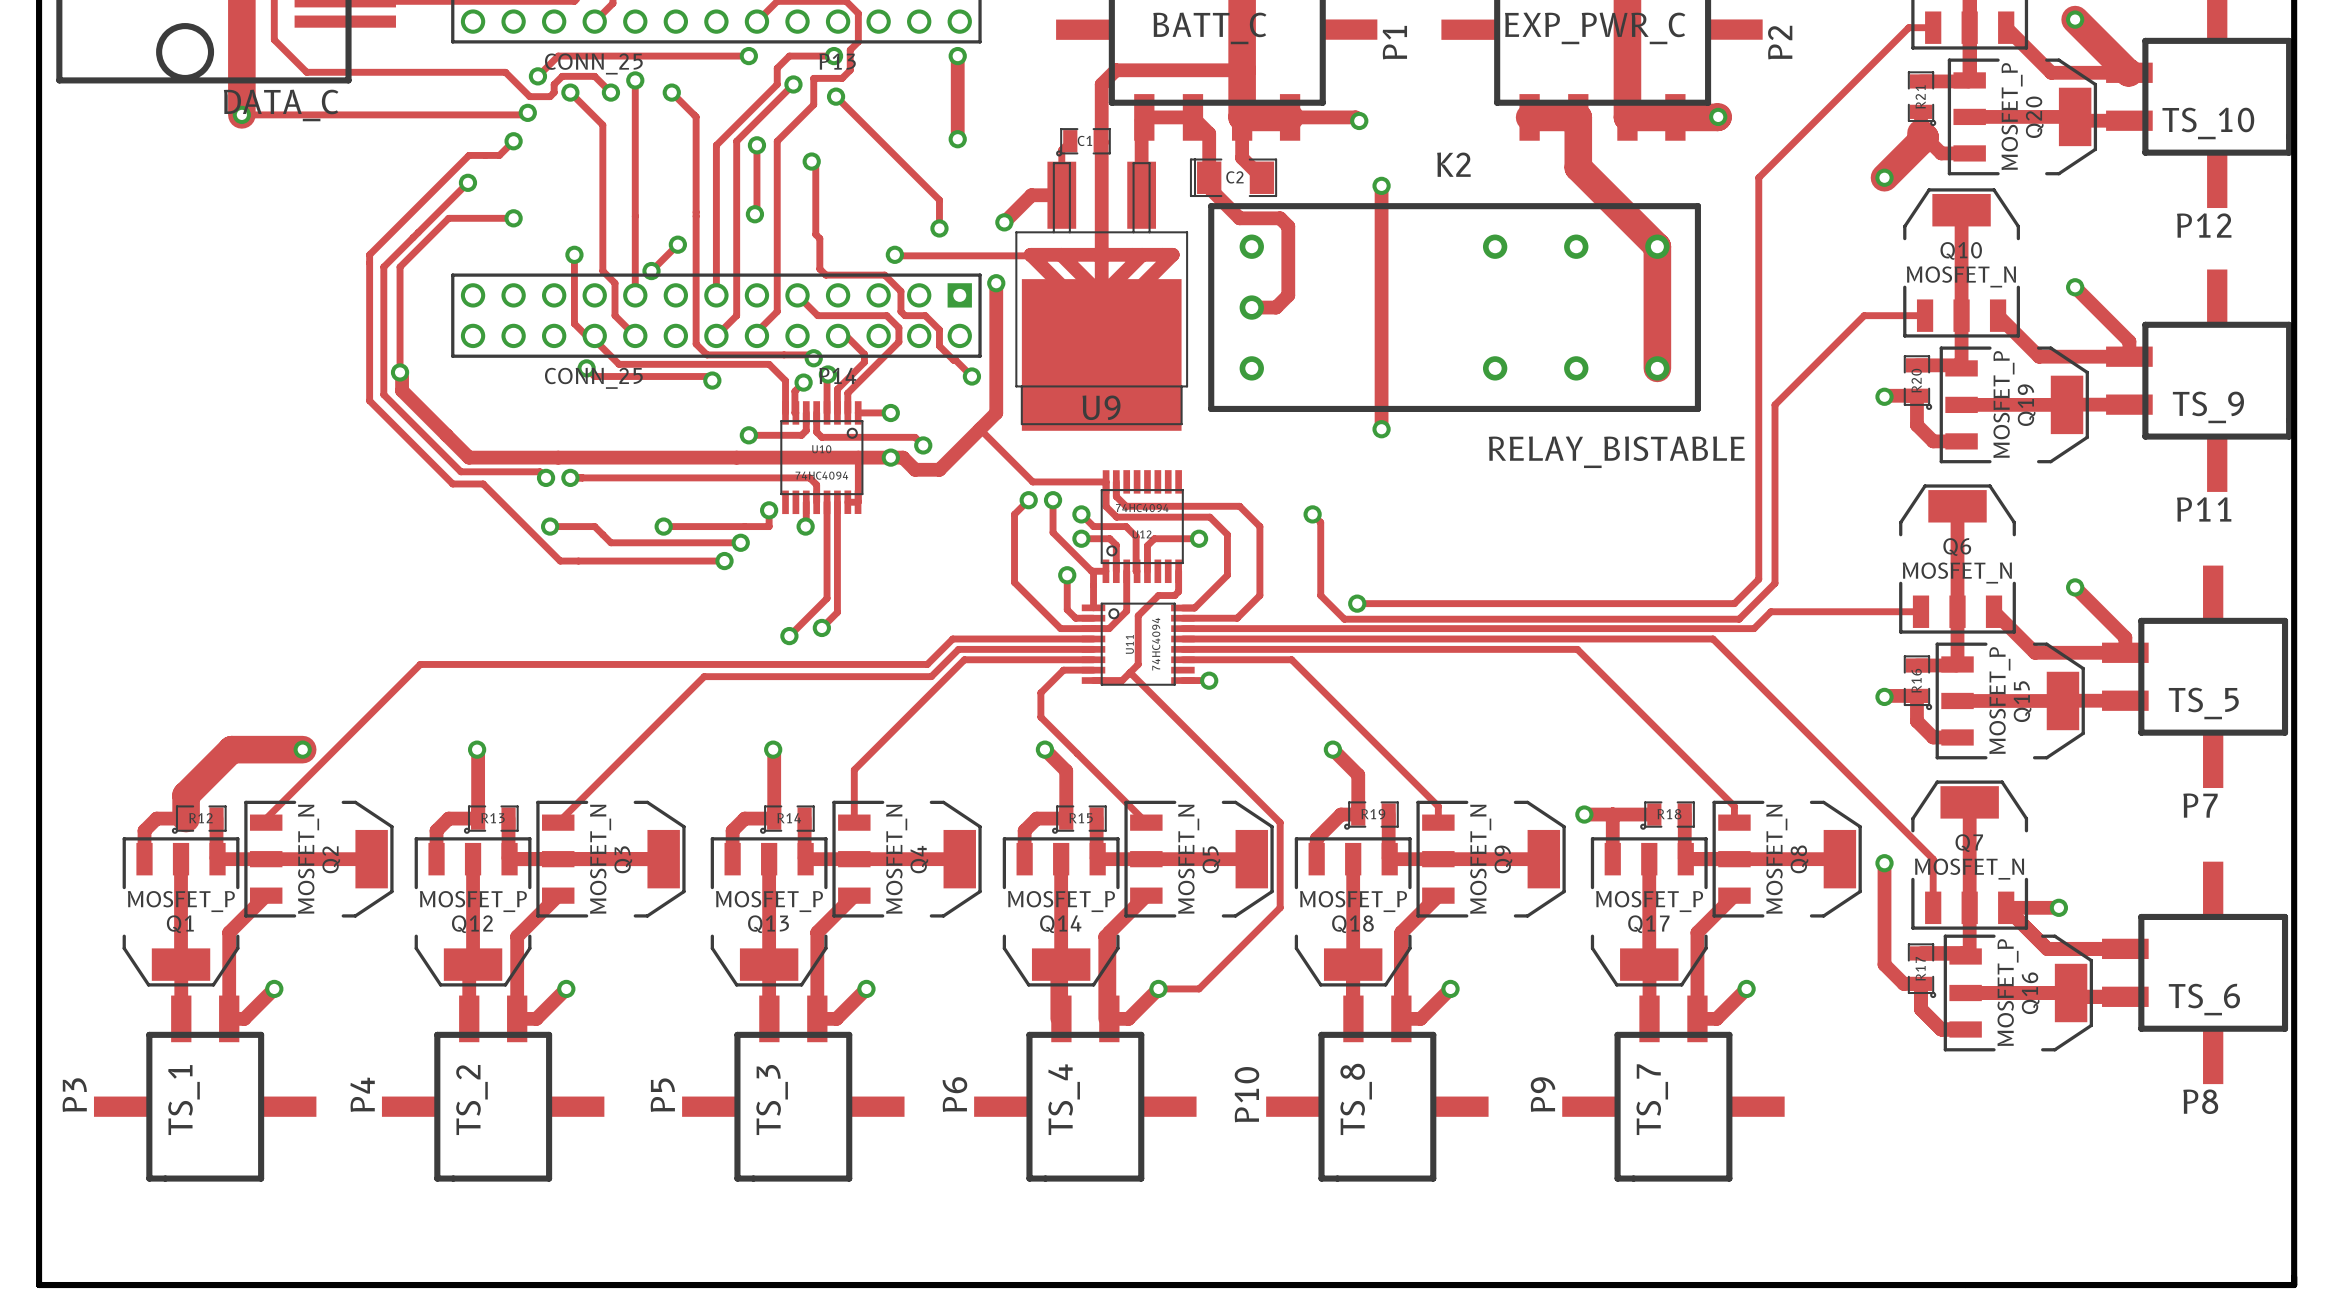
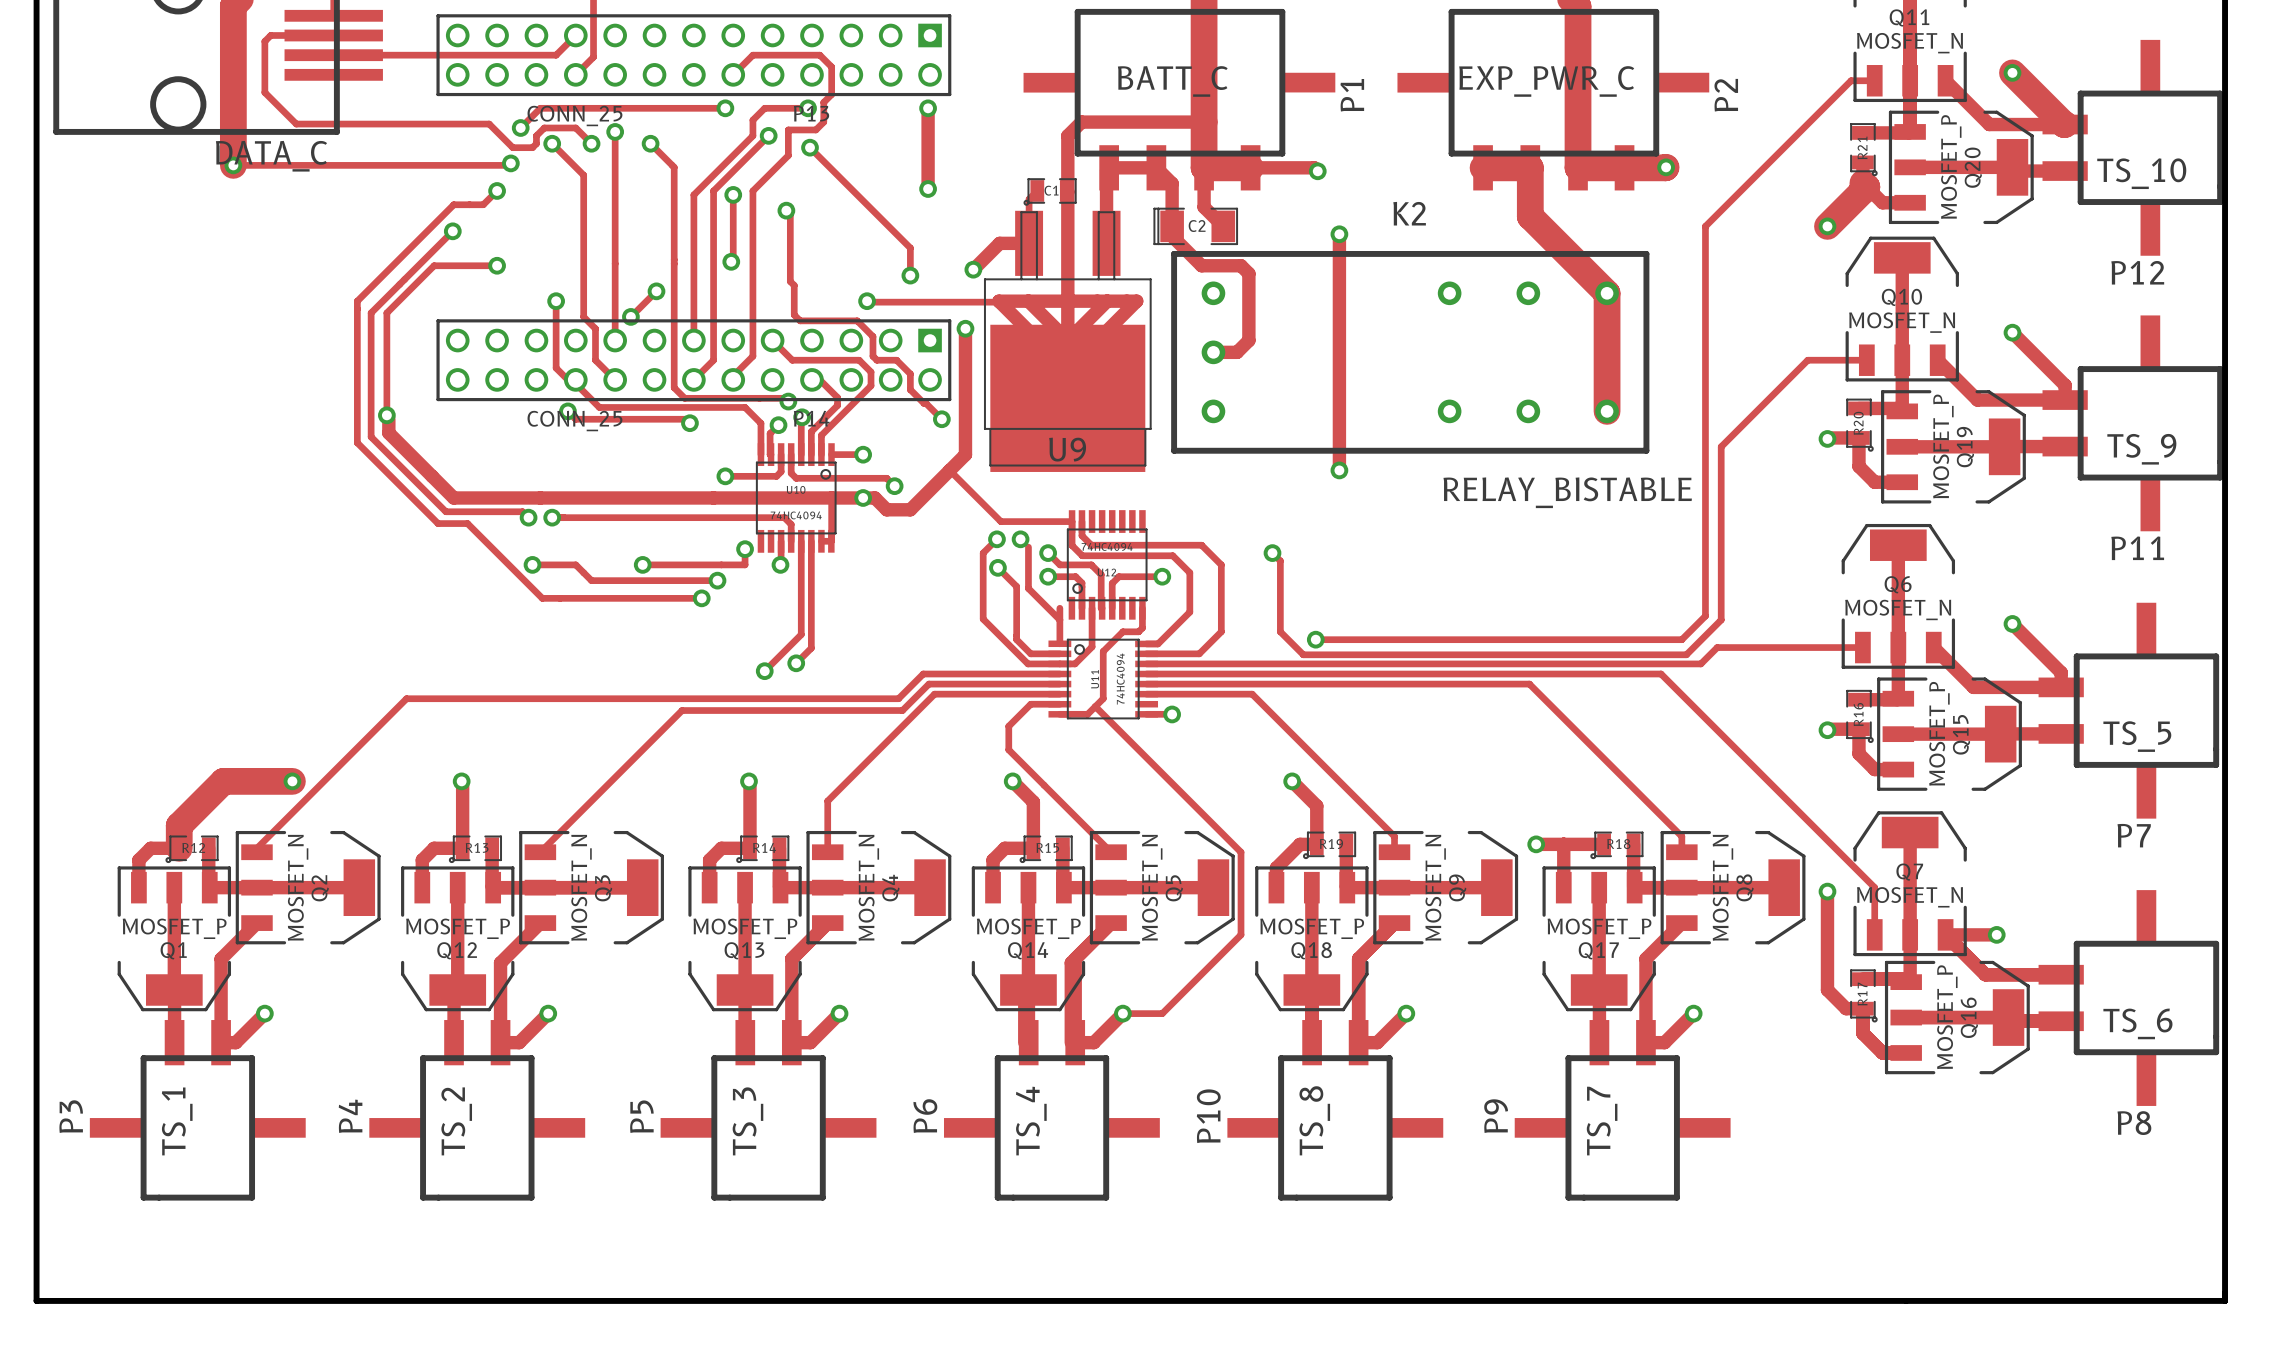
track: (1053, 500) (1053, 532) (1091, 571) (1105, 571) -> none
track: none -> (1028, 547) (1028, 588) (1059, 619)
track: (1067, 575) (1067, 609) (1075, 618) -> (997, 567) (1016, 586) (1016, 639) (1030, 653) (1042, 653)
via position: (1067, 575) -> (997, 567)

